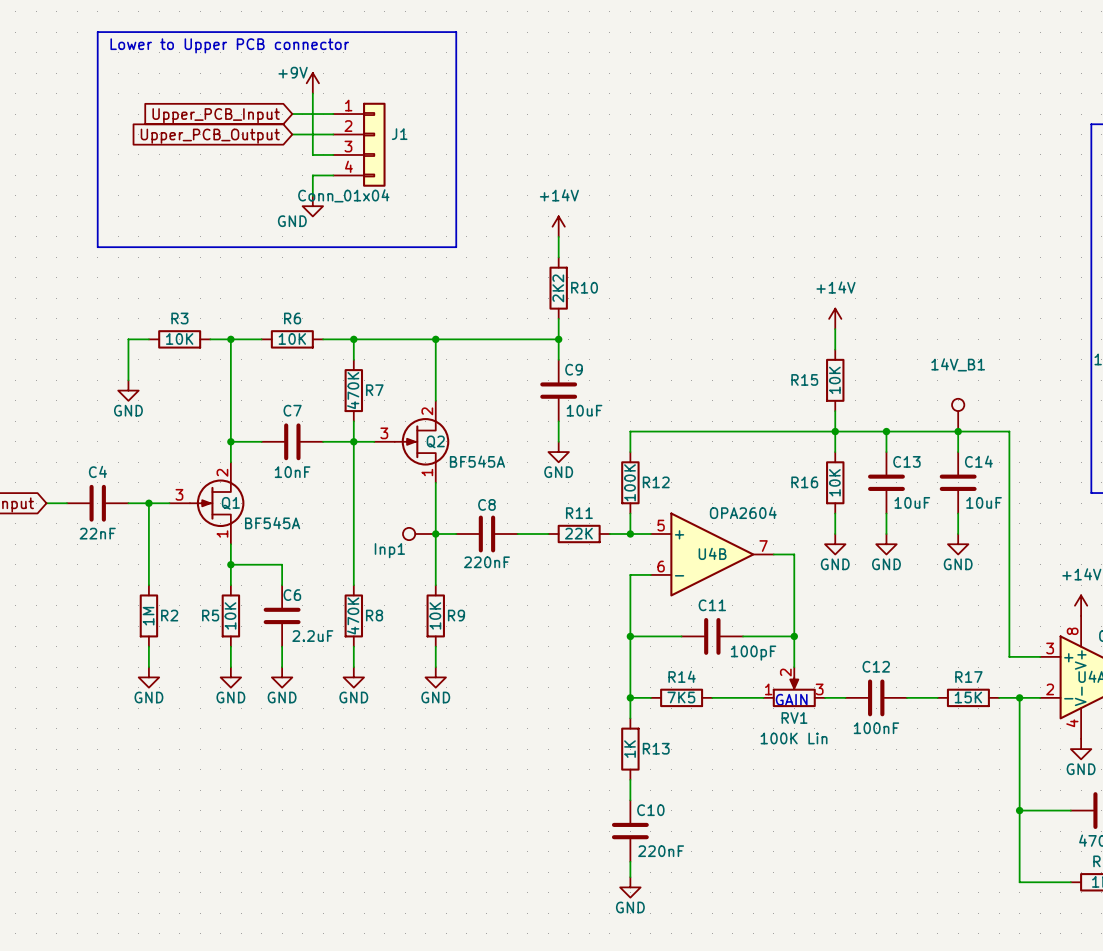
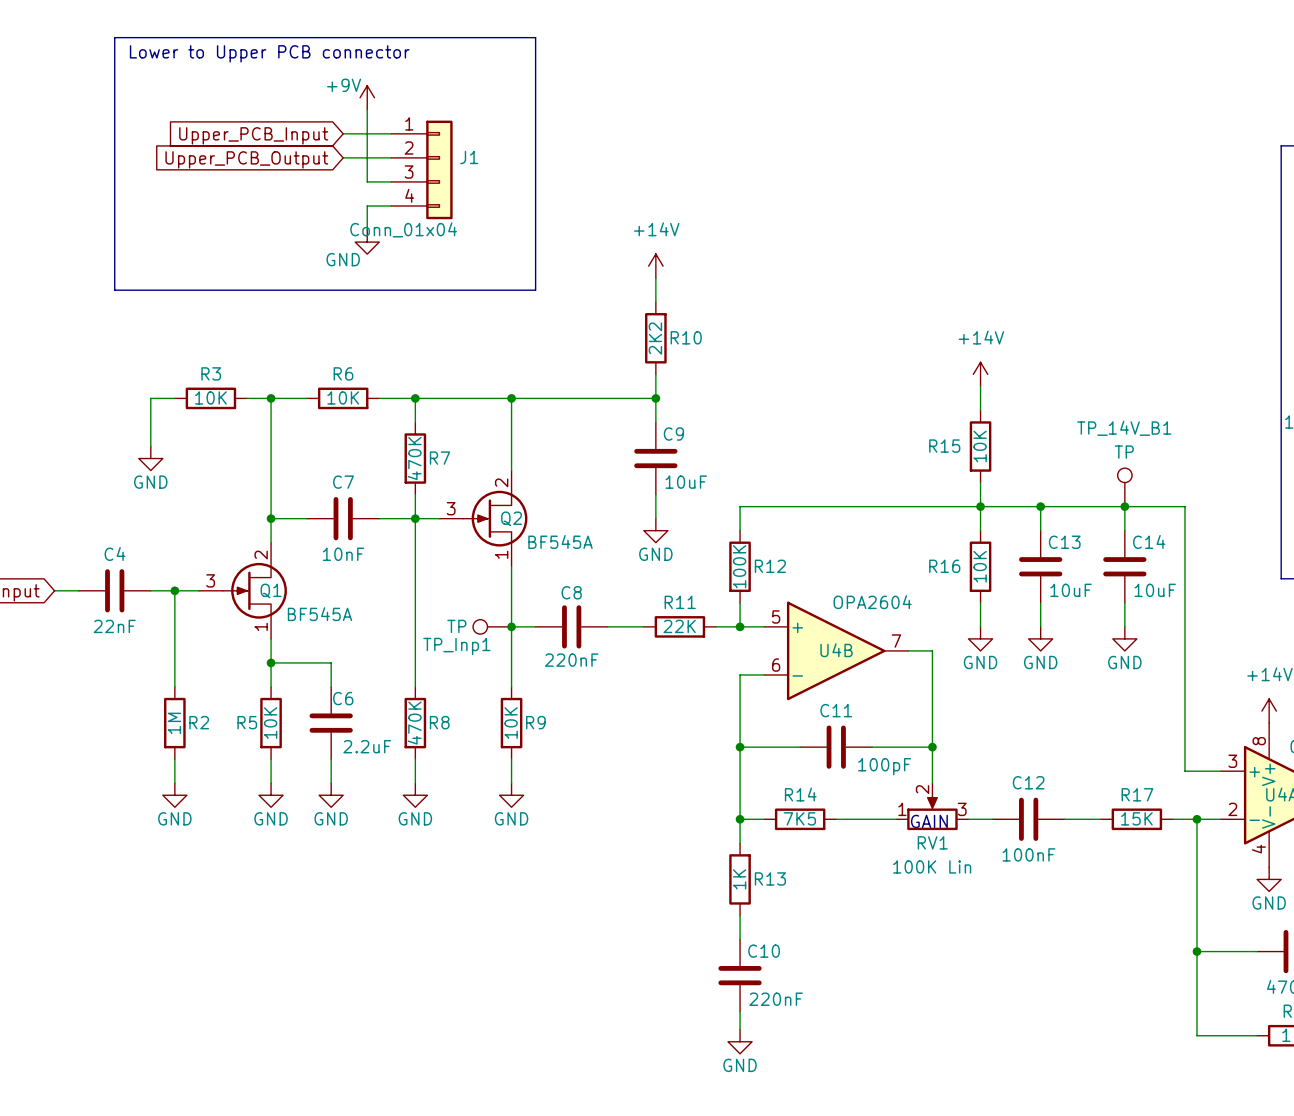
14V_B1 name: 14V_B1 (958, 364) -> TP_14V_B1 (1124, 428)
14V_B1 value: none -> TP (1124, 452)
Inp1 value: none -> TP (456, 626)
Inp1 name: Inp1 (389, 550) -> TP_Inp1 (456, 646)

